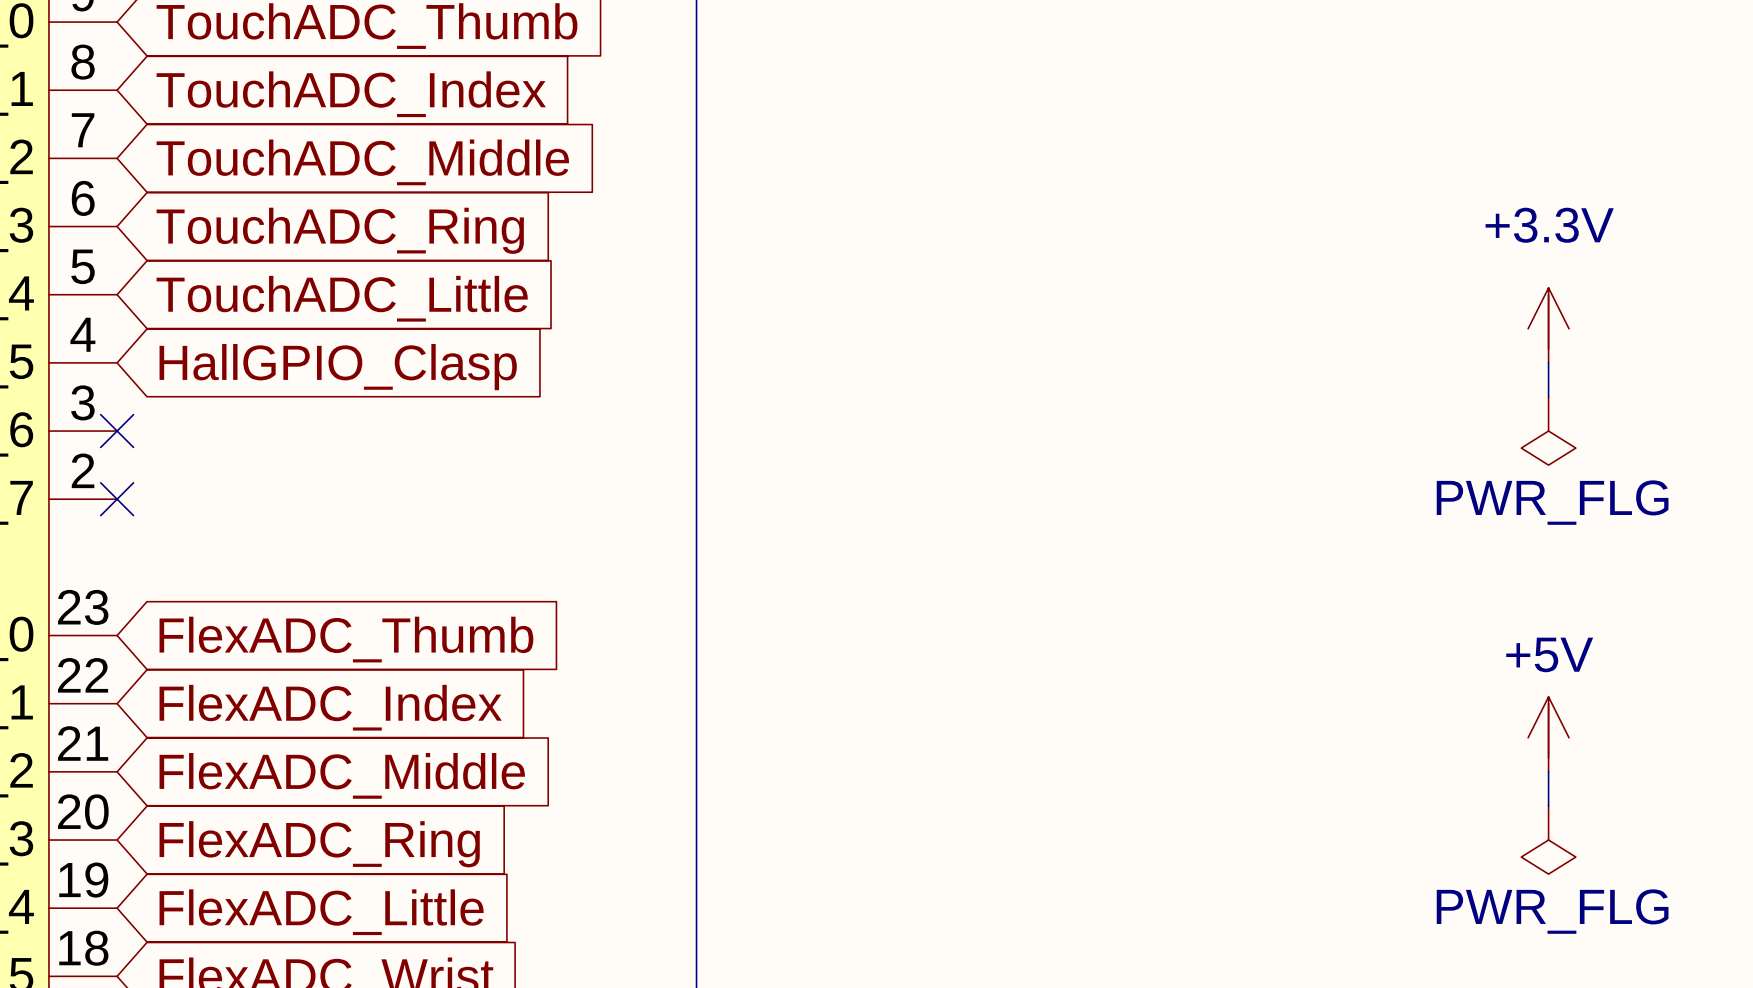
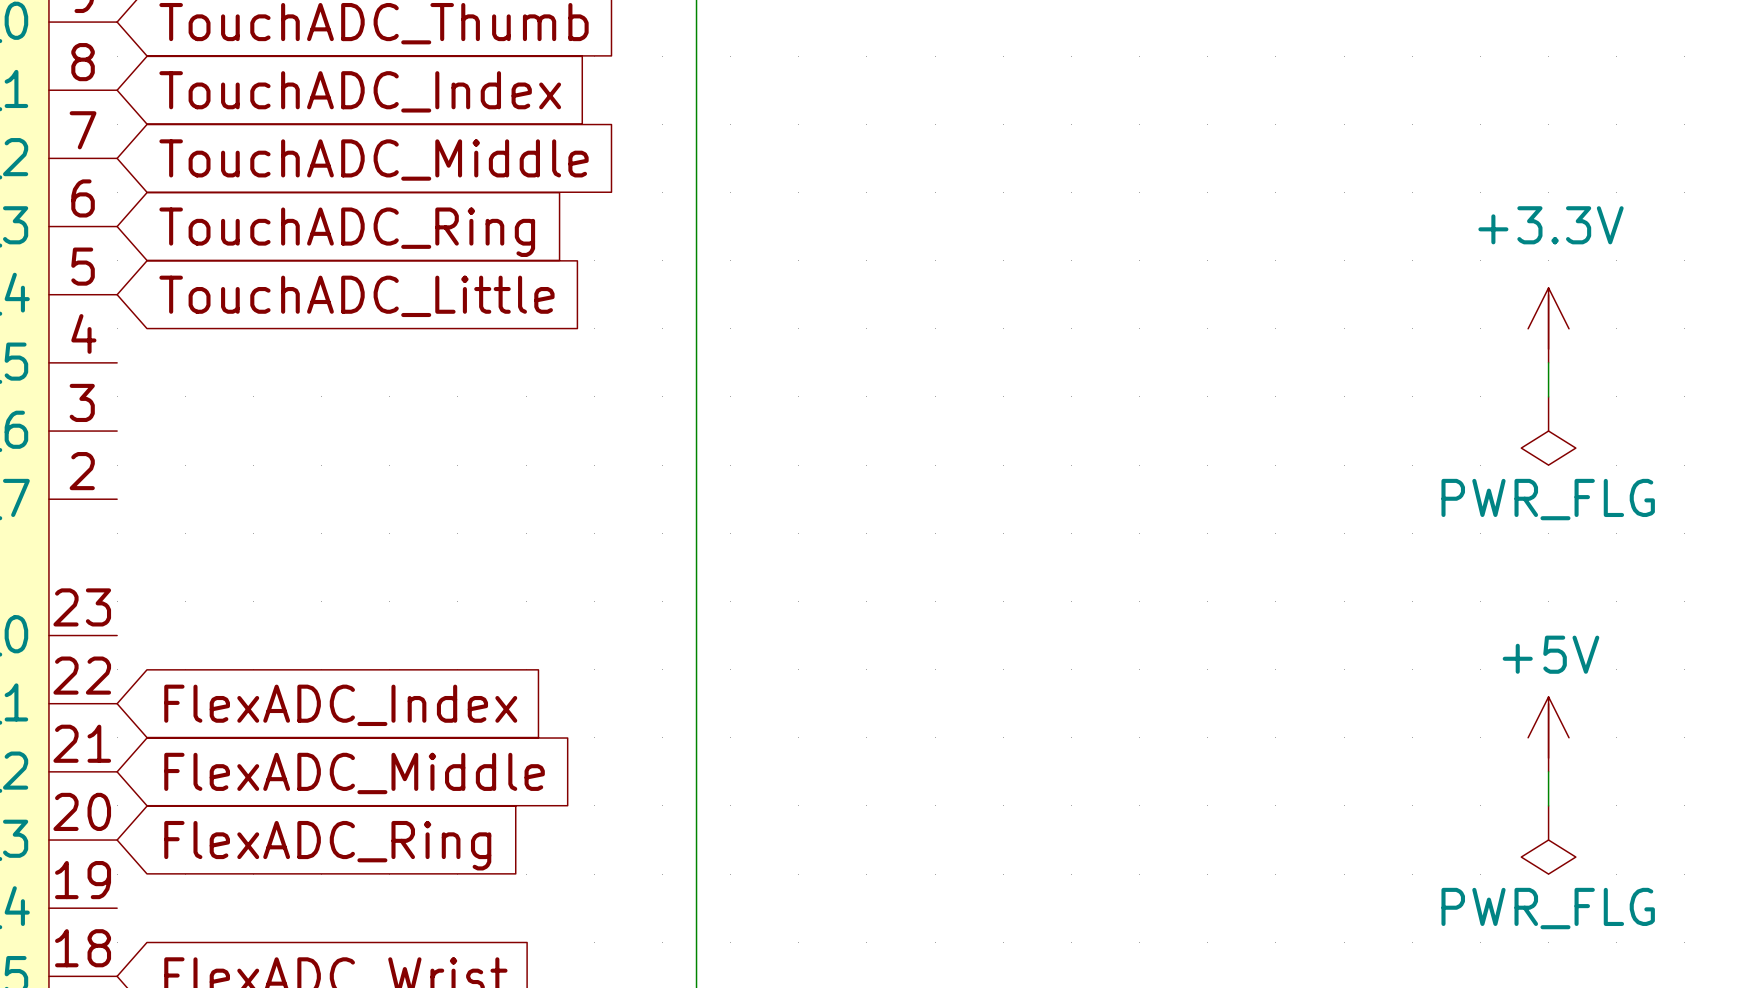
global label: HallGPIO_Clasp (338, 367) -> none
no-connect mark: (117, 431) -> none
no-connect mark: (117, 499) -> none
global label: FlexADC_Thumb (346, 639) -> none
global label: FlexADC_Little (321, 912) -> none

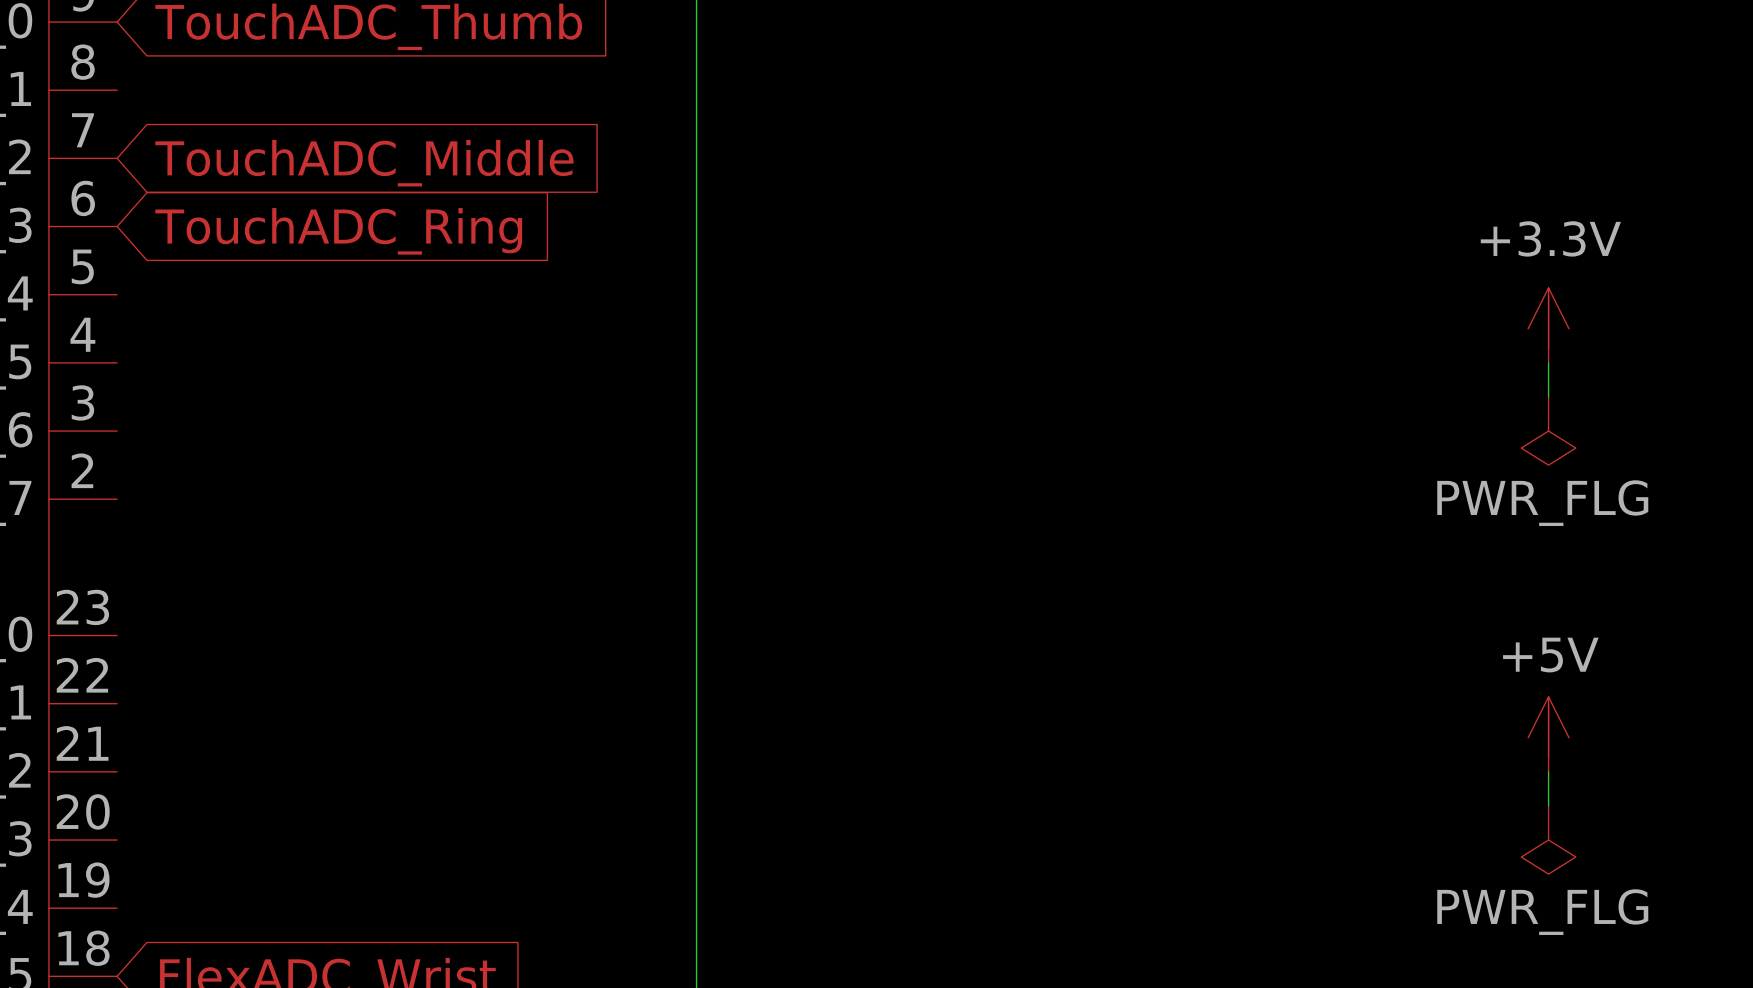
global label: TouchADC_Index (360, 91) -> none
power symbol text position: +3.3V (1551, 225) -> +3.3V (1550, 238)
global label: TouchADC_Little (356, 296) -> none
global label: FlexADC_Index (340, 705) -> none
global label: FlexADC_Middle (354, 773) -> none
global label: FlexADC_Ring (327, 845) -> none

